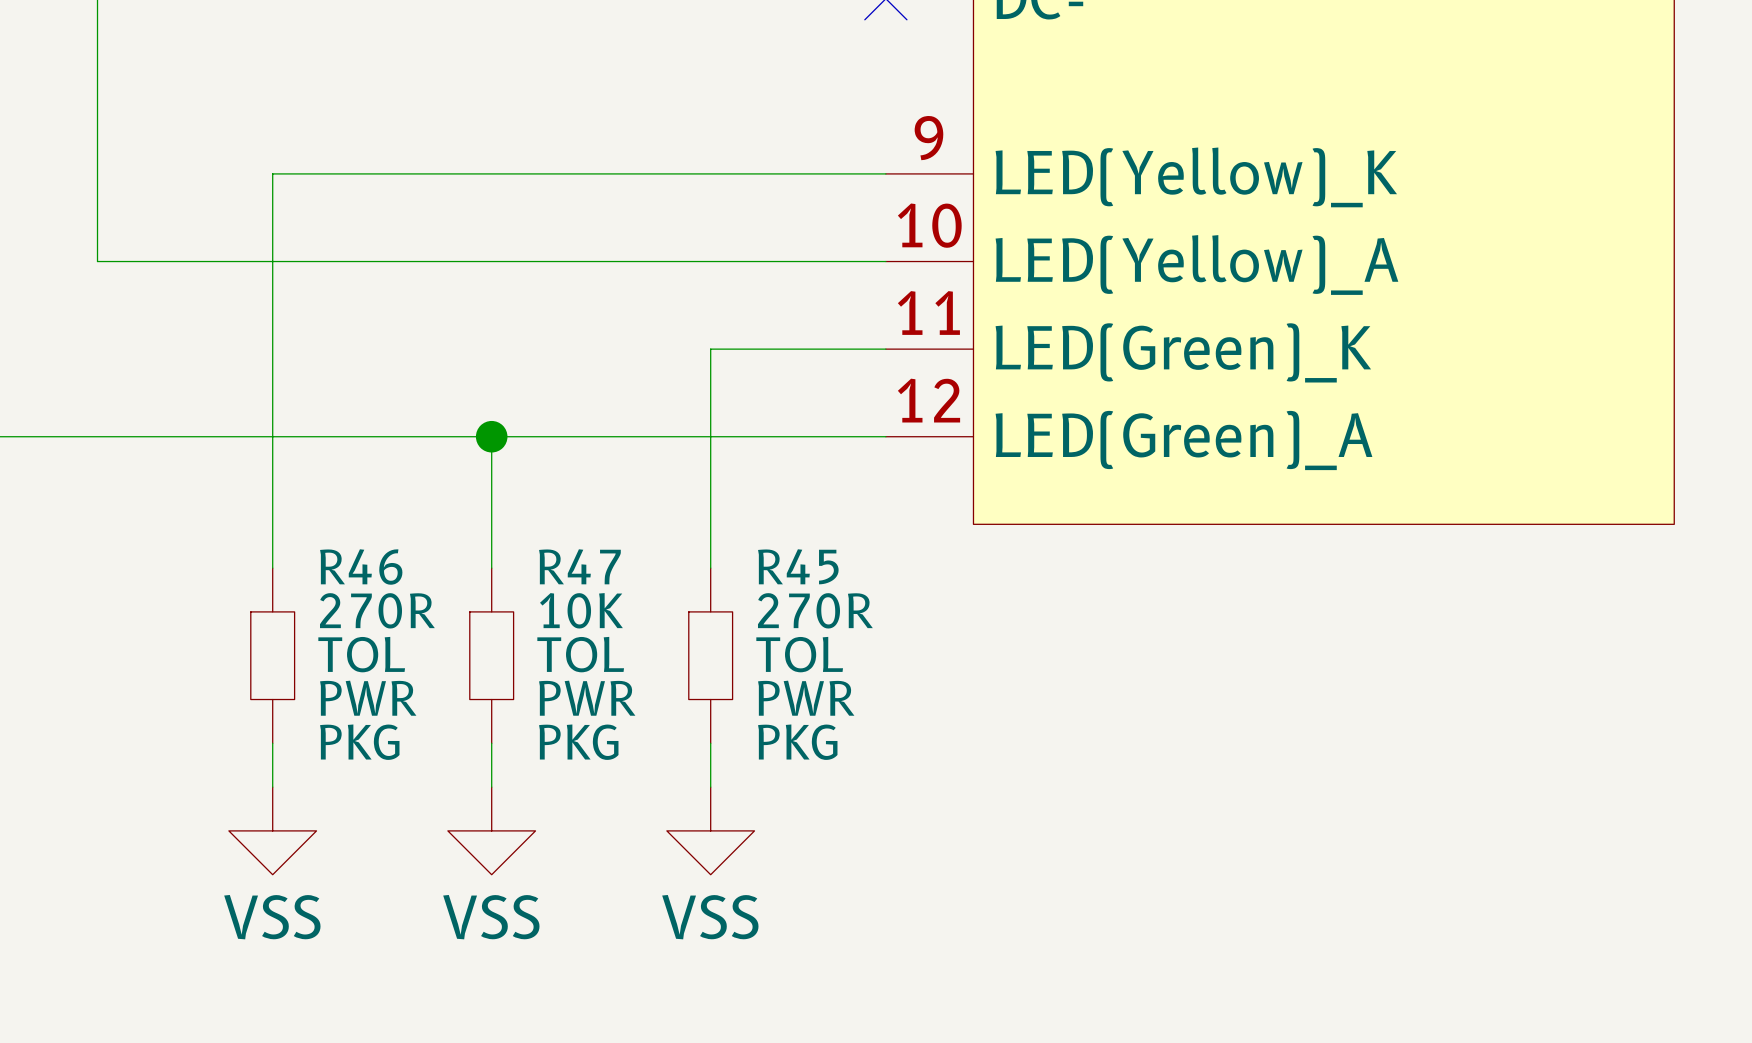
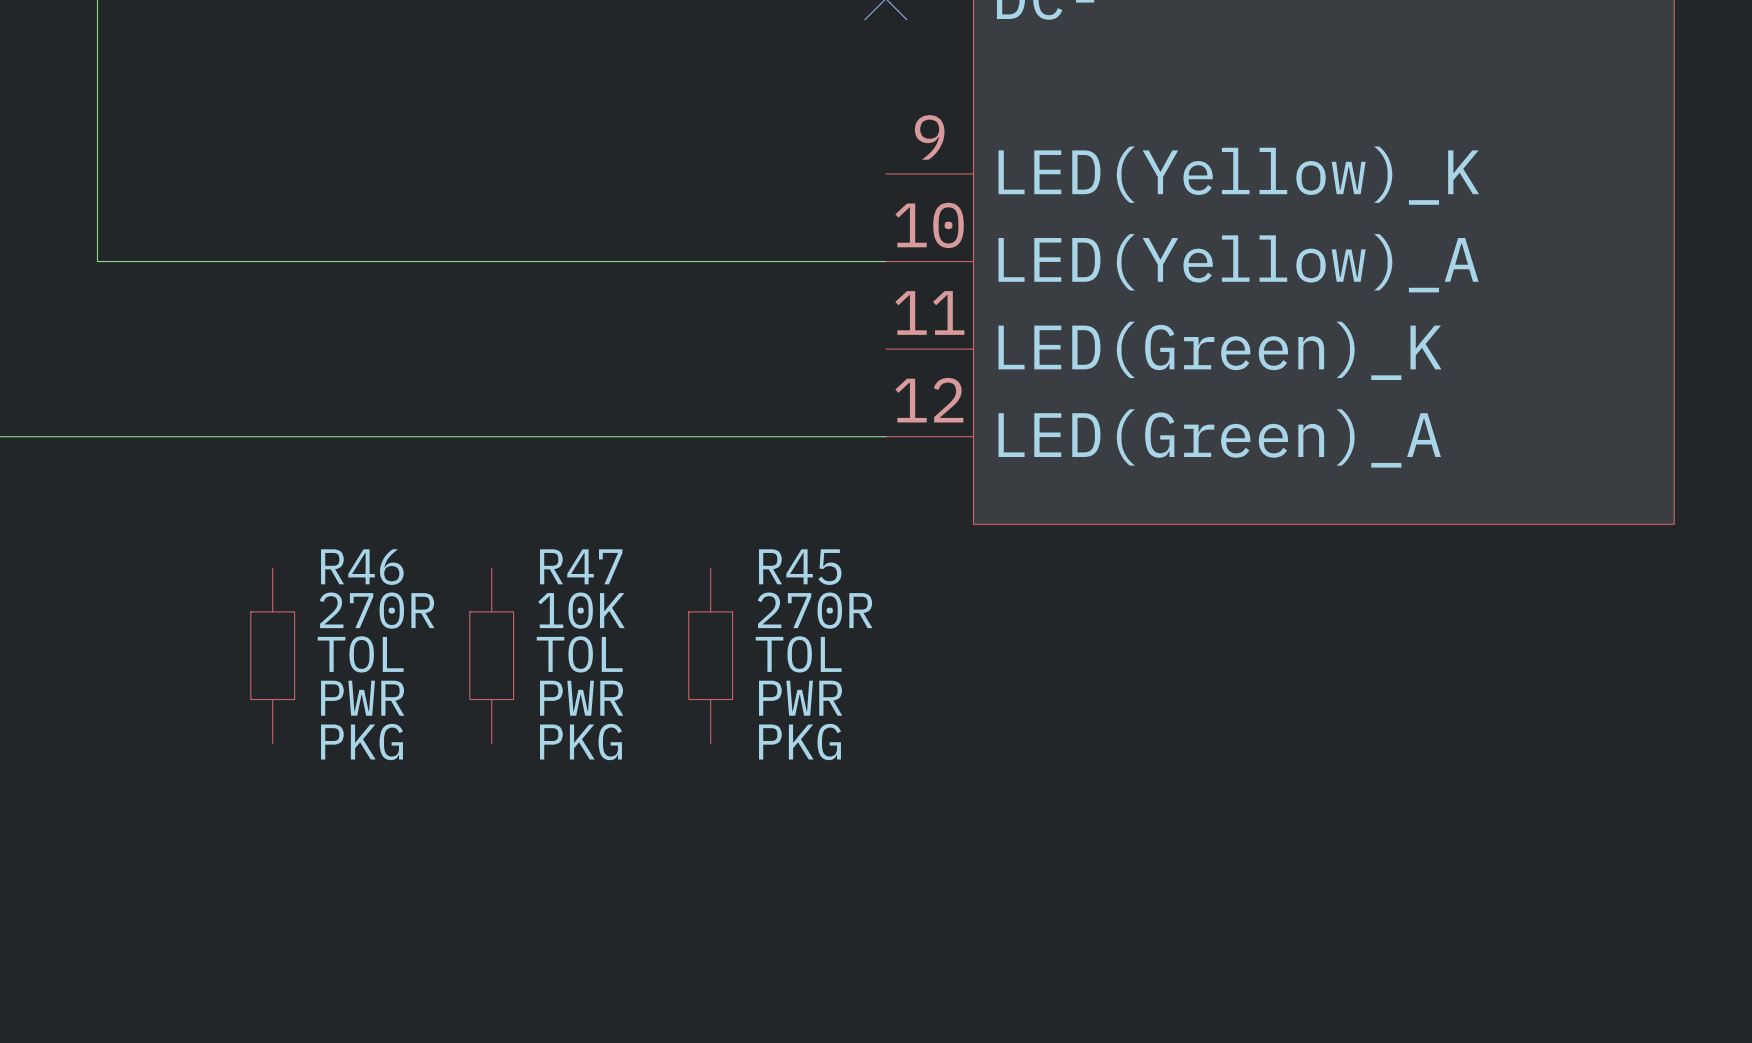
wire: (885, 173) (272, 173) (272, 568) -> none
wire: (885, 349) (710, 349) (710, 568) -> none
wire: (491, 436) (491, 568) -> none
junction: (491, 436) -> none
wire: (272, 743) (272, 787) -> none
wire: (491, 743) (491, 787) -> none
wire: (710, 743) (710, 787) -> none
power symbol: VSS (272, 830) -> none
power symbol: VSS (491, 830) -> none
power symbol: VSS (710, 830) -> none

